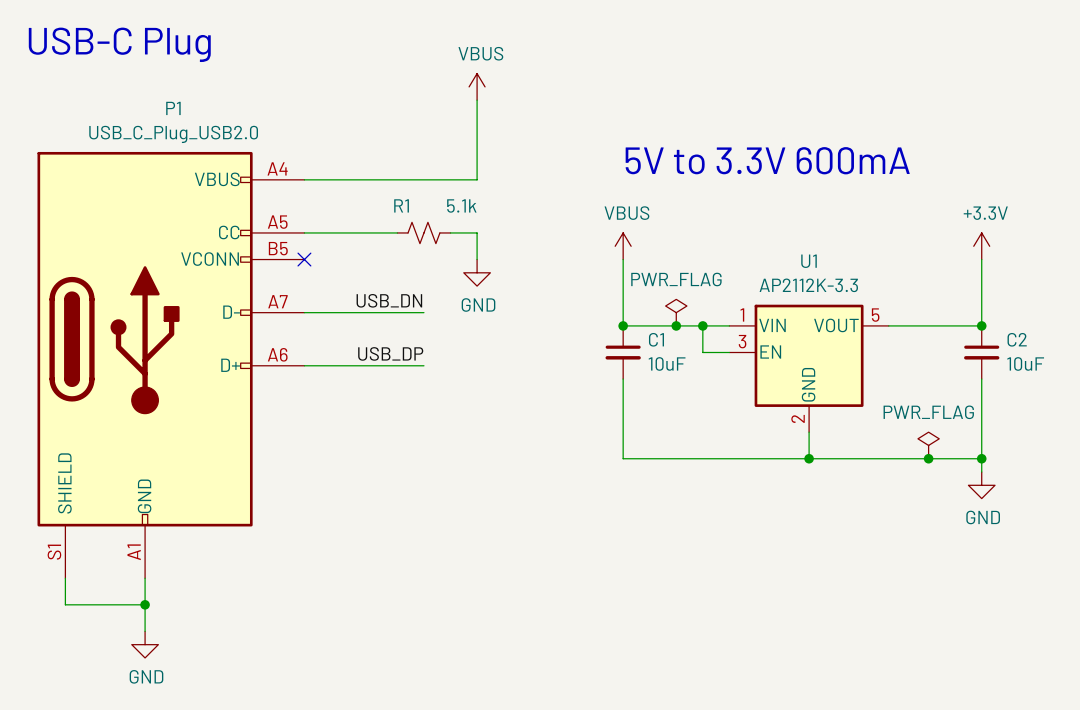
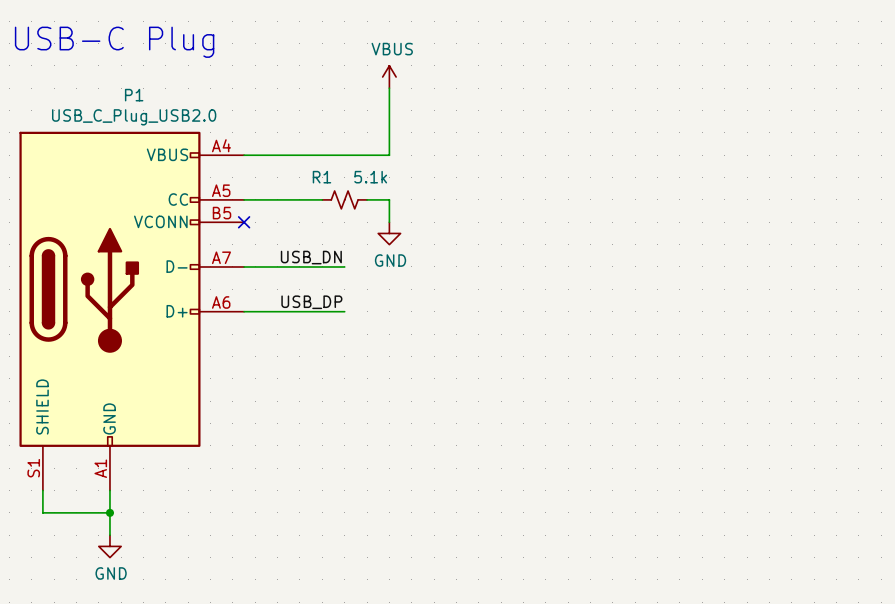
text: 5V to 3.3V 600mA (767, 160) -> none
power symbol: VBUS (623, 246) -> none
power symbol: +3.3V (981, 246) -> none
wire: (623, 259) (623, 325) (729, 325) -> none
wire: (981, 259) (981, 325) (888, 325) -> none
power symbol: PWR_FLAG (676, 312) -> none
junction: (623, 325) -> none
junction: (676, 325) -> none
wire: (702, 325) (702, 352) (729, 352) -> none
junction: (702, 325) -> none
junction: (981, 325) -> none
C1: 10uF (623, 352) -> none
C2: 10uF (981, 352) -> none
U1: AP2112K-3.3 (809, 368) -> none
wire: (623, 379) (623, 458) (981, 458) -> none
wire: (981, 379) (981, 472) -> none
wire: (809, 432) (809, 458) -> none
power symbol: PWR_FLAG (928, 445) -> none
junction: (809, 458) -> none
junction: (928, 458) -> none
junction: (981, 458) -> none
power symbol: GND (981, 485) -> none

